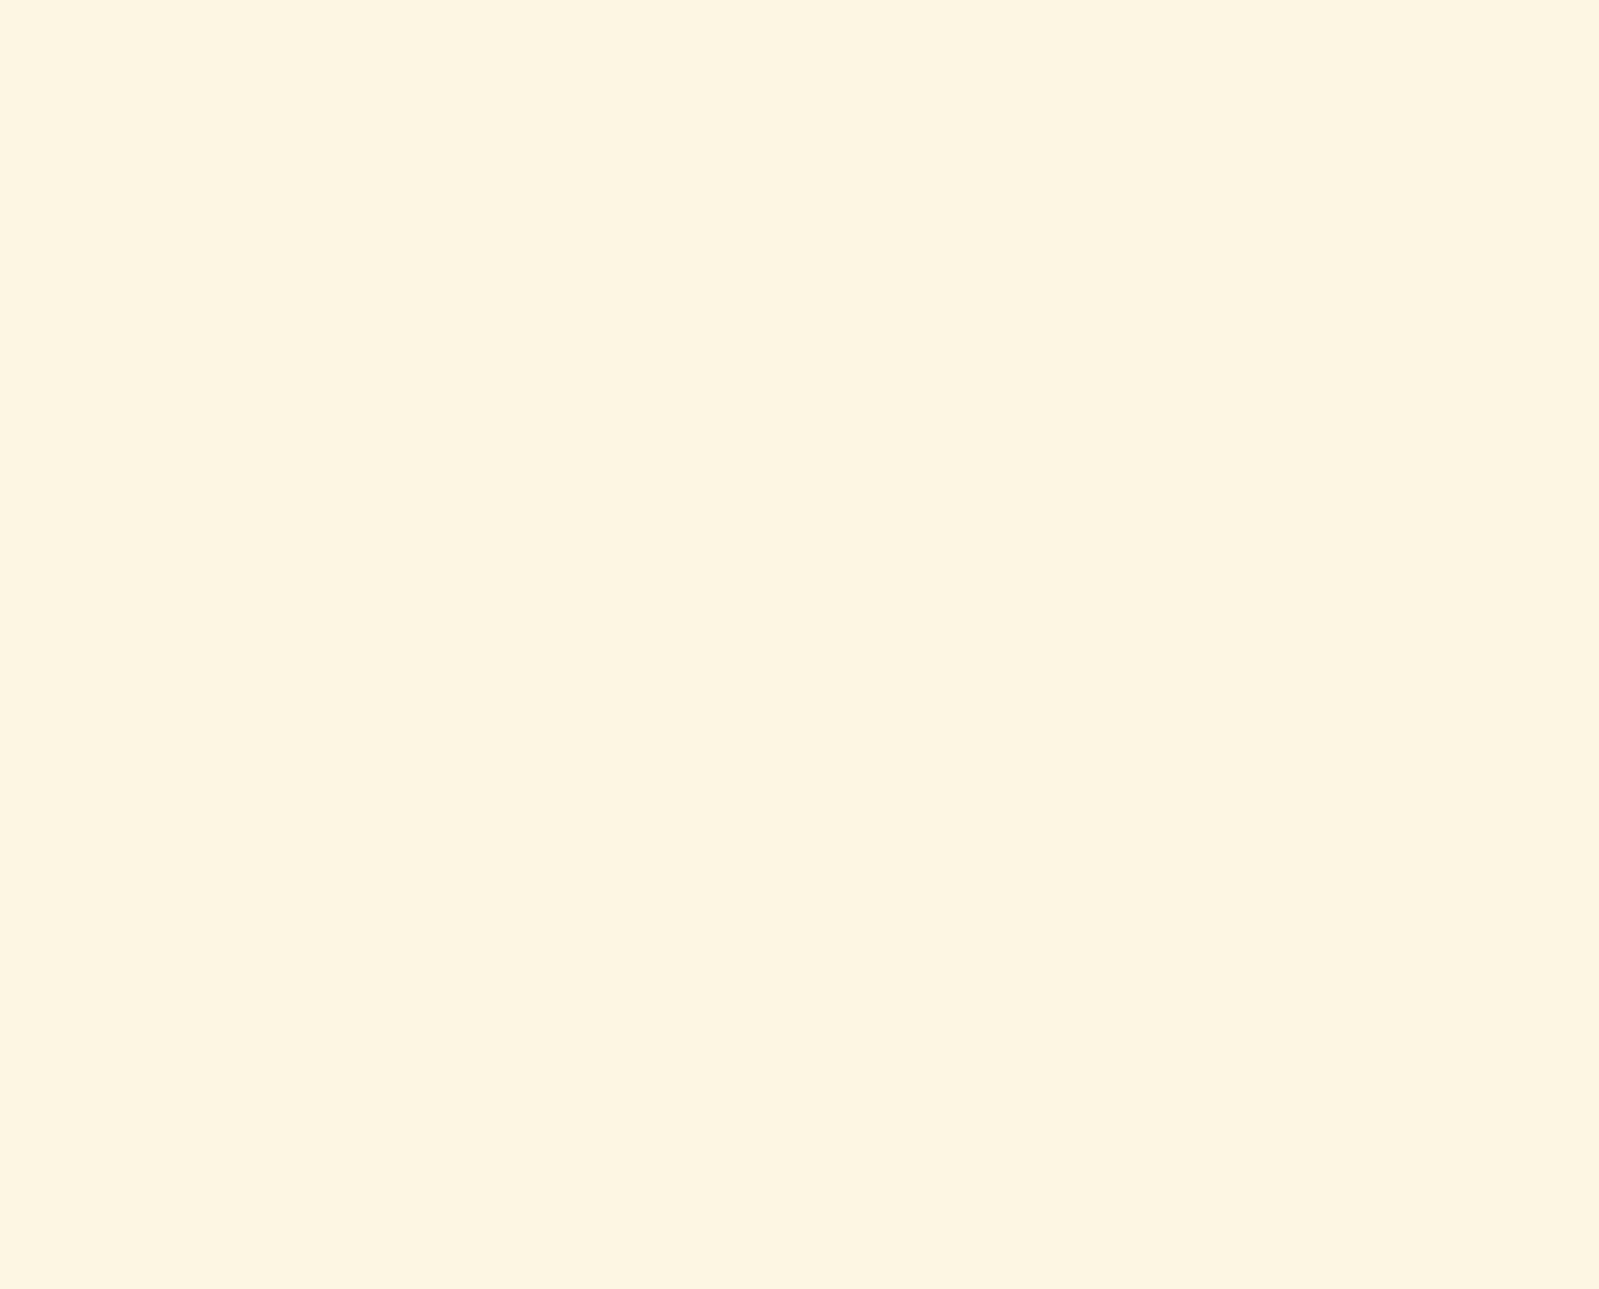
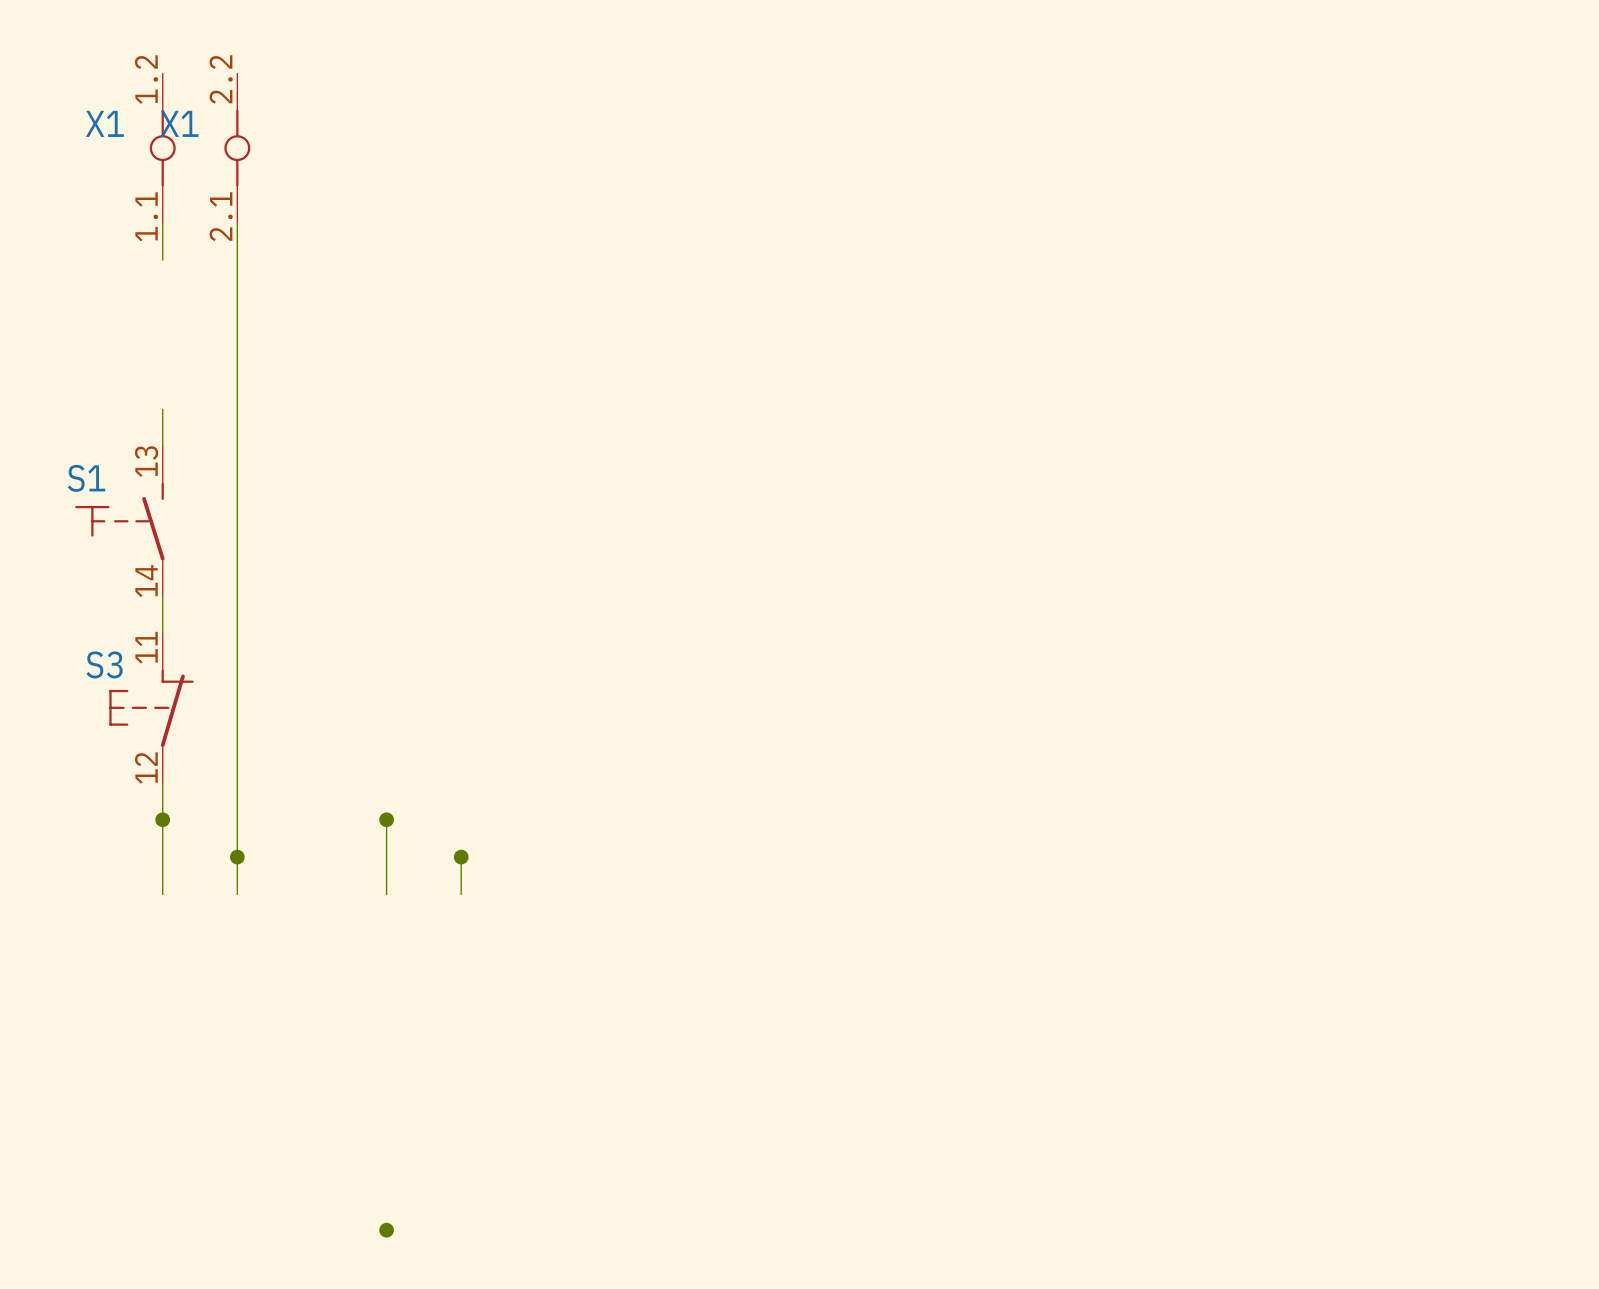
X1: none -> (162, 148)
X1: none -> (237, 148)
wire: none -> (162, 222) (162, 260)
wire: none -> (237, 222) (237, 894)
wire: none -> (162, 409) (162, 446)
S1: none -> (119, 521)
wire: none -> (162, 595) (162, 633)
S3: none -> (151, 707)
wire: none -> (162, 782) (162, 894)
junction: none -> (162, 819)
wire: none -> (386, 819) (386, 894)
junction: none -> (386, 819)
junction: none -> (237, 857)
wire: none -> (461, 857) (461, 894)
junction: none -> (461, 857)
junction: none -> (386, 1230)

